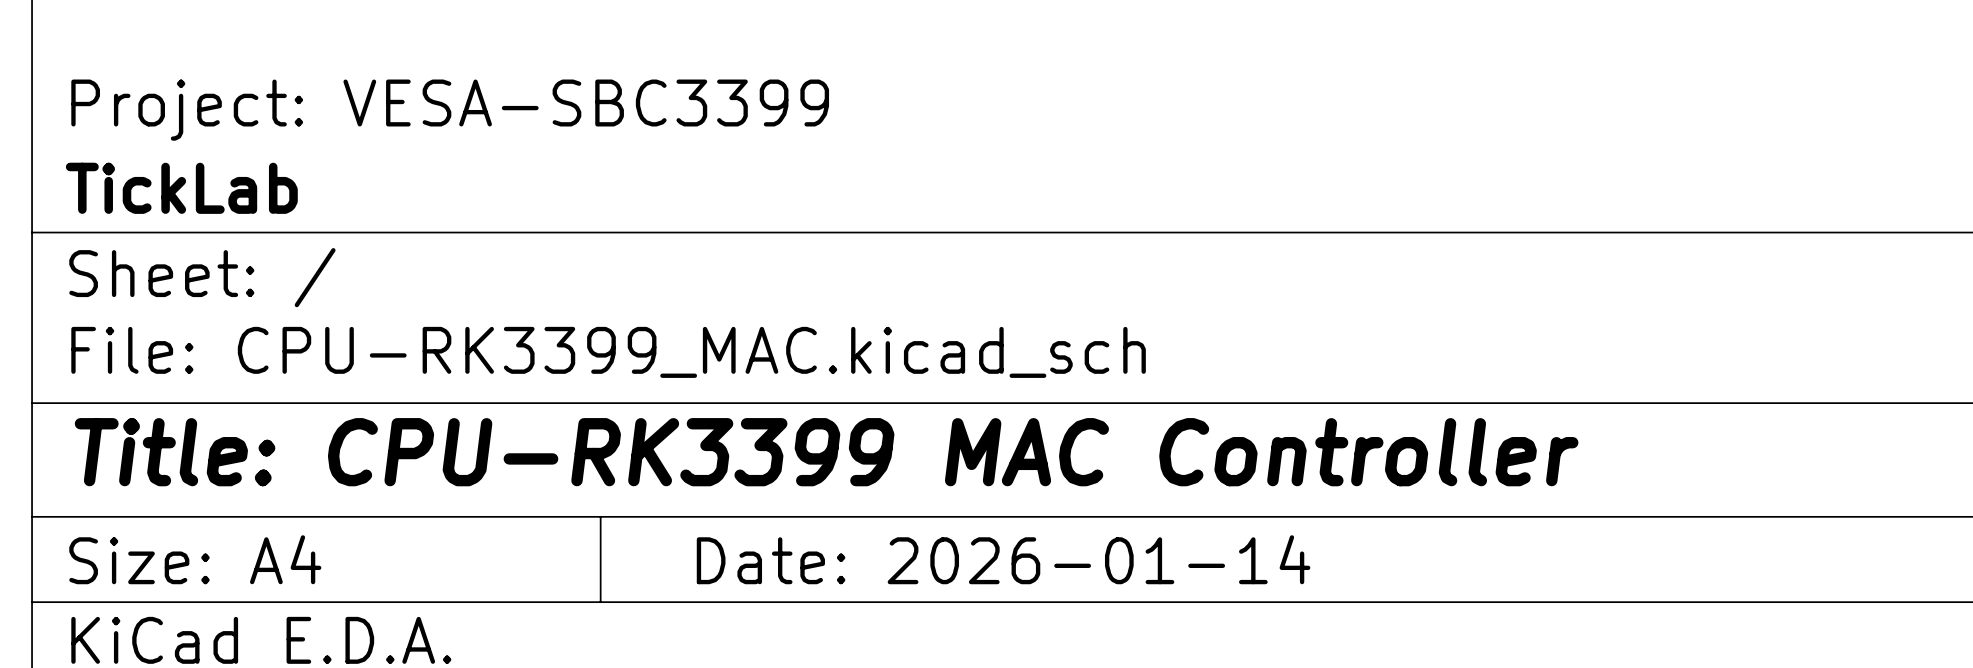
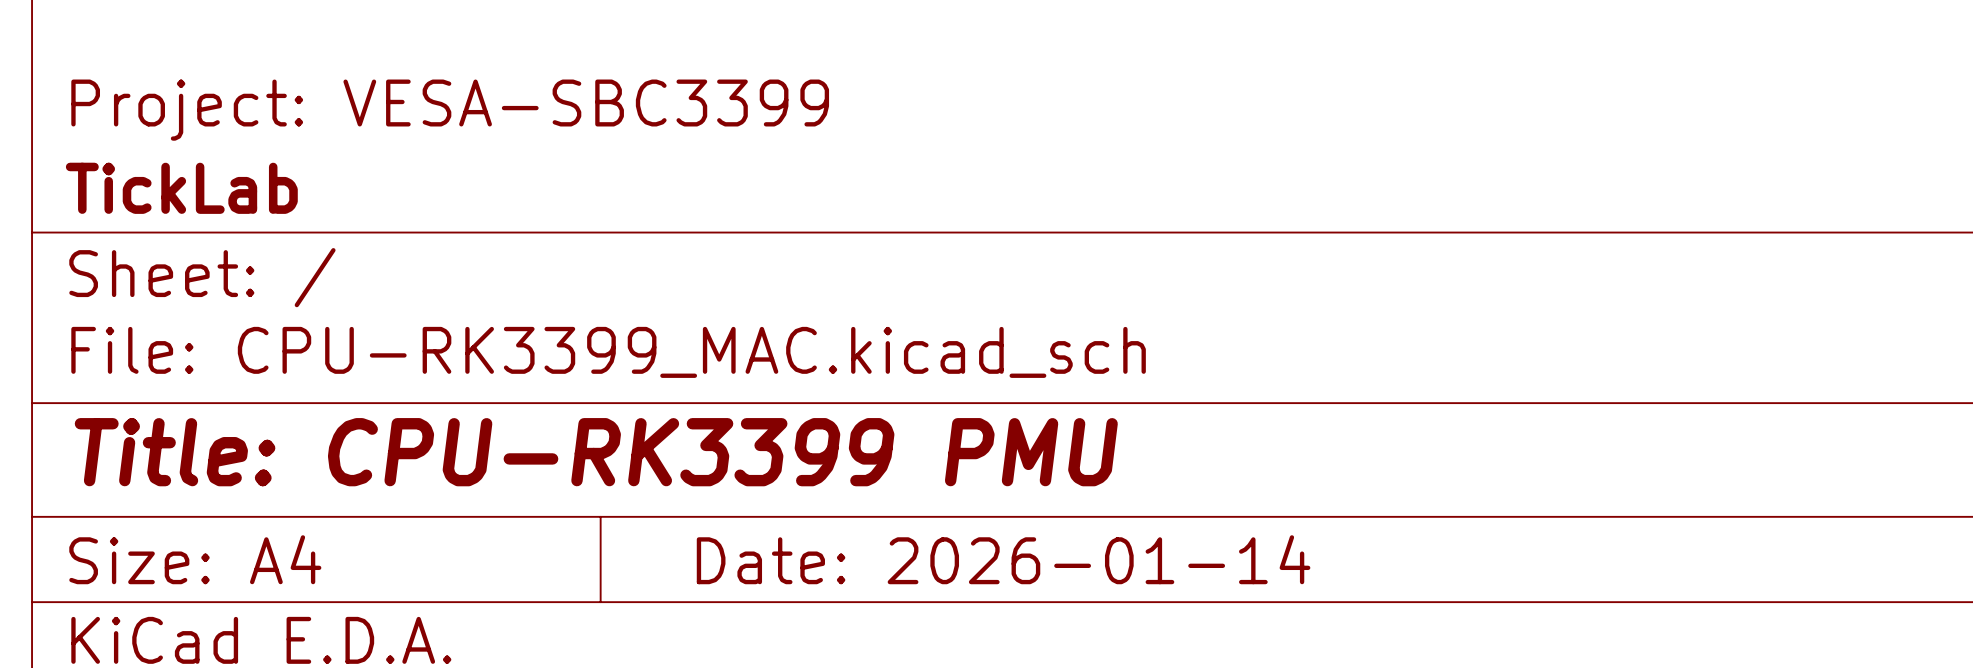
title block: Title: CPU-RK3399 MAC Controller (826, 452) -> Title: CPU-RK3399 PMU (596, 452)

